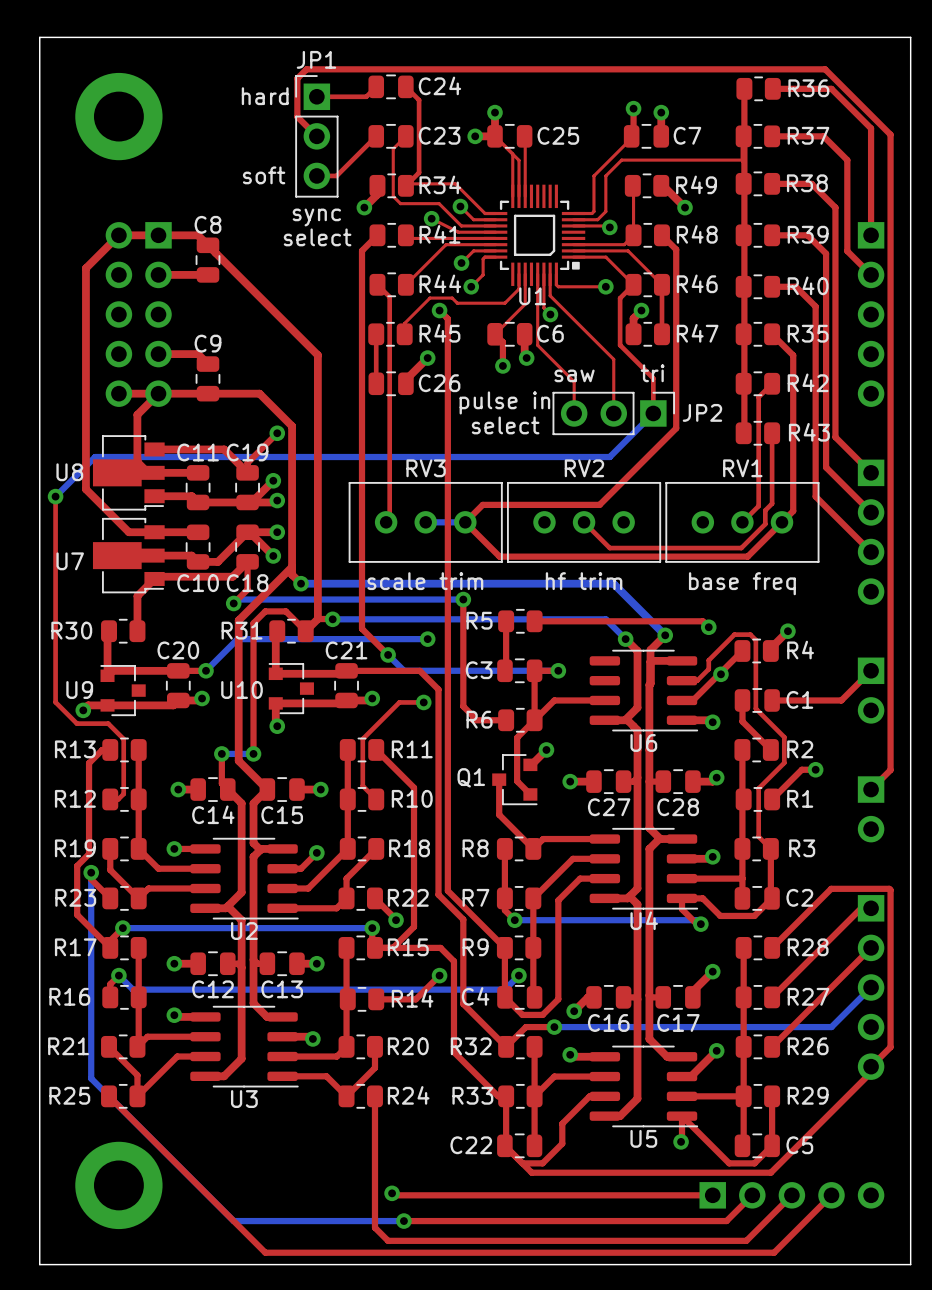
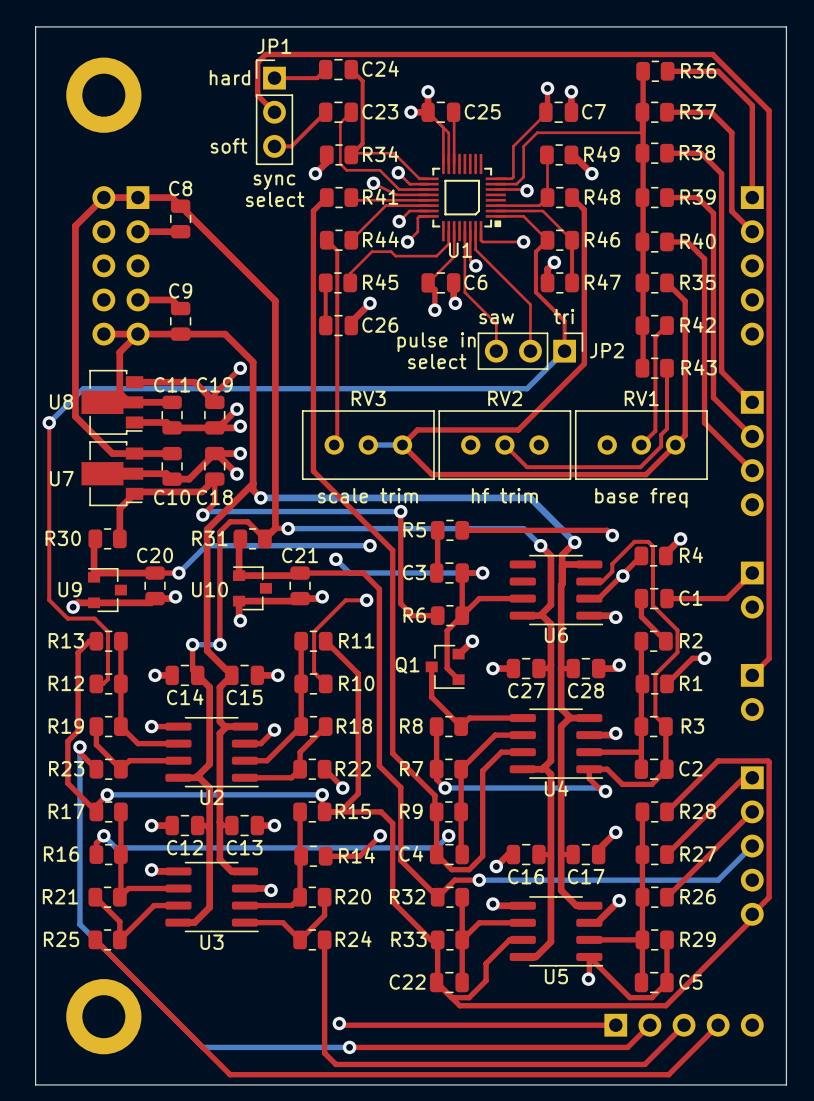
top track: (439, 310) (447, 318) (447, 890) (502, 945) -> (313, 471) (392, 550) (392, 753) (434, 795) (434, 810)
via: (439, 310) -> none
top track: (362, 552) (362, 628) (388, 654) -> none

